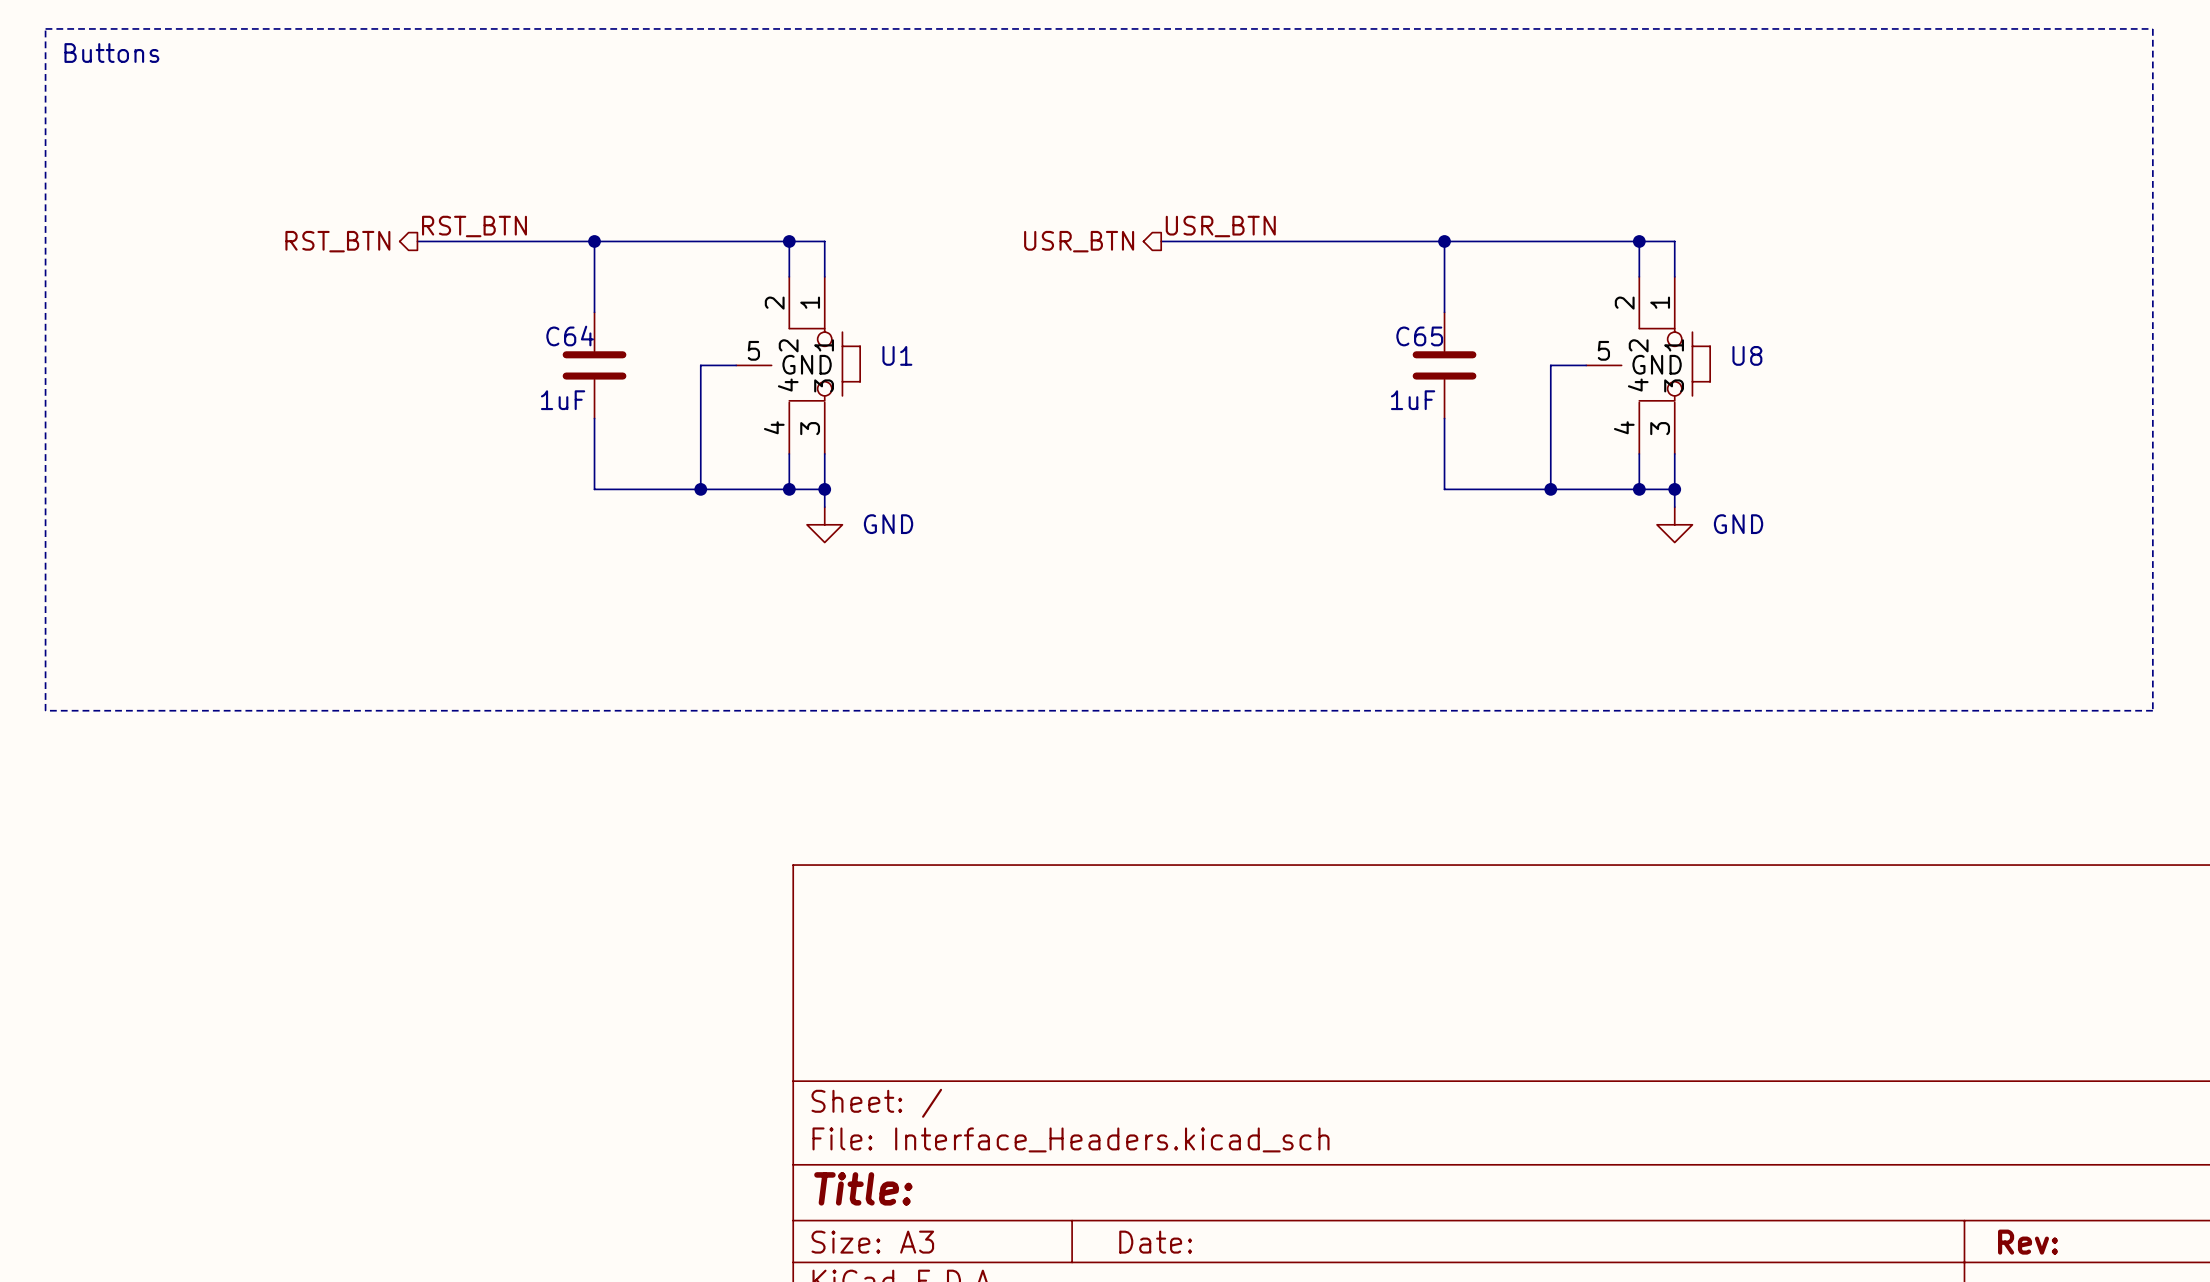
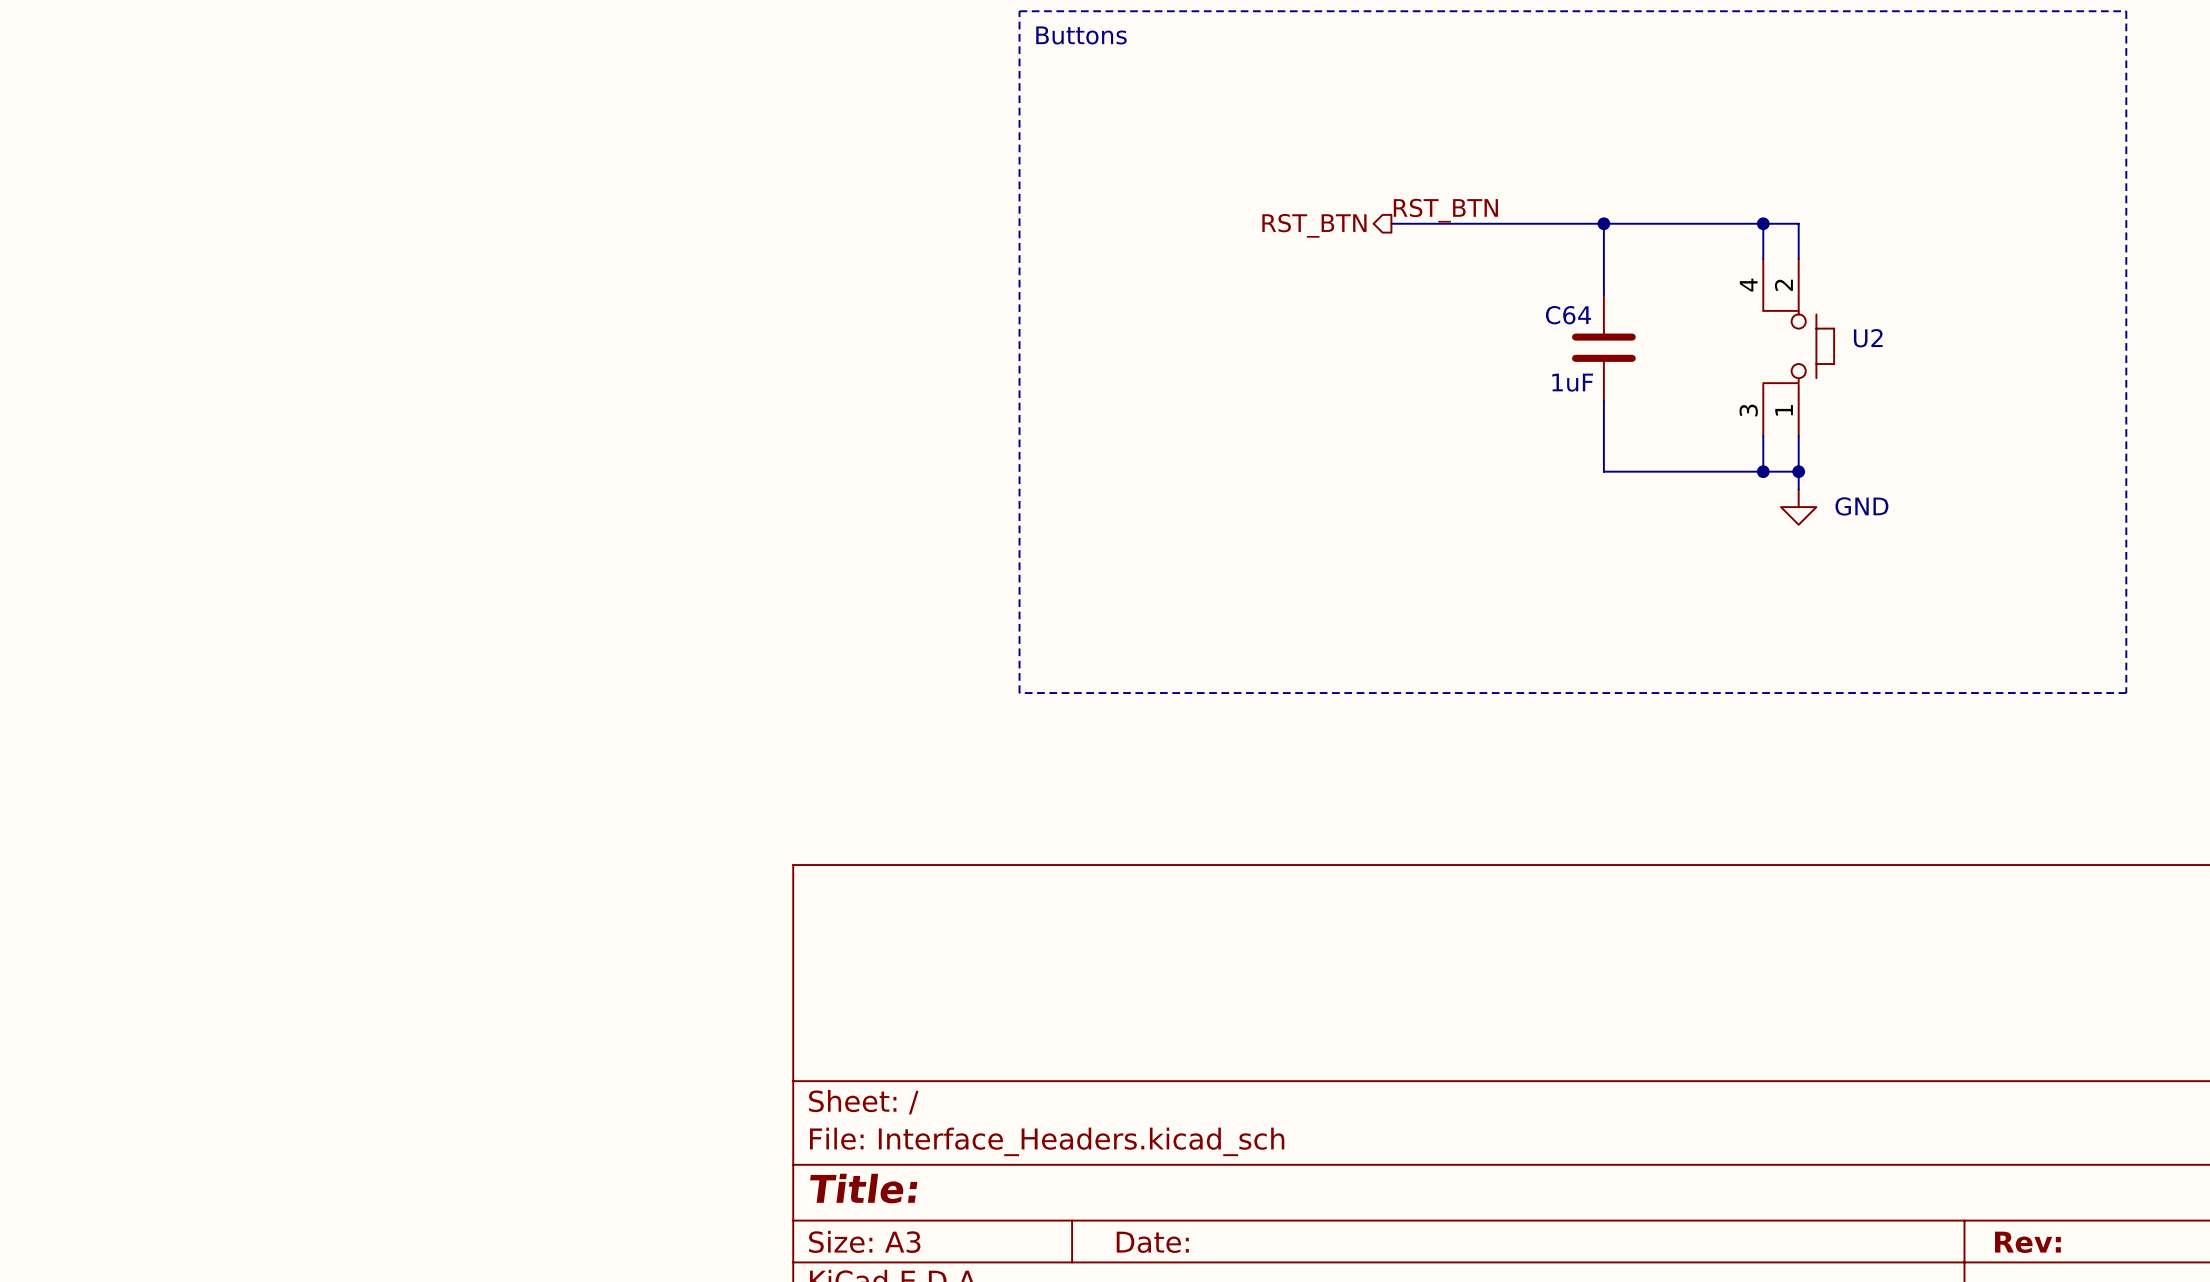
line: (45, 28) (2152, 28) (2152, 710) (45, 710) (45, 28) -> (1019, 11) (1019, 693) (2126, 693) (2126, 11) (1019, 11)
text: none -> Buttons (1081, 35)
text: Buttons (111, 53) -> none
label: none -> RST_BTN (1445, 210)
hierarchical label: none -> RST_BTN (1314, 225)
wire: none -> (1391, 223) (1798, 223) (1798, 259)
junction: none -> (1763, 223)
label: RST_BTN (474, 226) -> none
label: USR_BTN (1220, 226) -> none
hierarchical label: RST_BTN (337, 241) -> none
wire: (417, 241) (824, 241) (824, 276) -> none
wire: (594, 241) (594, 312) -> none
junction: (594, 241) -> none
wire: (789, 241) (789, 276) -> none
junction: (789, 241) -> none
hierarchical label: USR_BTN (1079, 241) -> none
wire: (1161, 241) (1674, 241) (1674, 276) -> none
wire: (1444, 241) (1444, 312) -> (1603, 223) (1603, 294)
junction: (1444, 241) -> none
wire: (1639, 241) (1639, 276) -> (1763, 223) (1763, 259)
junction position: (1639, 241) -> (1603, 223)
C64 name position: C64 (570, 336) -> C64 (1568, 315)
U2: none -> (1798, 347)
C64 position: (594, 365) -> (1603, 347)
wire: (736, 365) (700, 365) (700, 489) -> none
U1: (798, 365) -> none
C65: 1uF (1444, 365) -> none
wire: (1586, 365) (1550, 365) (1550, 489) -> none
U8: (1648, 365) -> none
wire: none -> (1603, 400) (1603, 471) (1798, 471)
wire: (594, 418) (594, 489) (824, 489) -> none
wire: (1444, 418) (1444, 489) (1674, 489) -> none
wire: (789, 453) (789, 489) -> none
wire: (824, 453) (824, 507) -> none
wire: (1639, 453) (1639, 489) -> (1763, 436) (1763, 471)
wire: (1674, 453) (1674, 507) -> (1798, 436) (1798, 489)
junction: none -> (1763, 471)
junction: none -> (1798, 471)
junction: (700, 489) -> none
junction: (789, 489) -> none
junction: (824, 489) -> none
junction: (1550, 489) -> none
junction: (1639, 489) -> none
junction: (1674, 489) -> none
power symbol: GND (824, 524) -> none
power symbol position: GND (1674, 524) -> GND (1798, 507)

